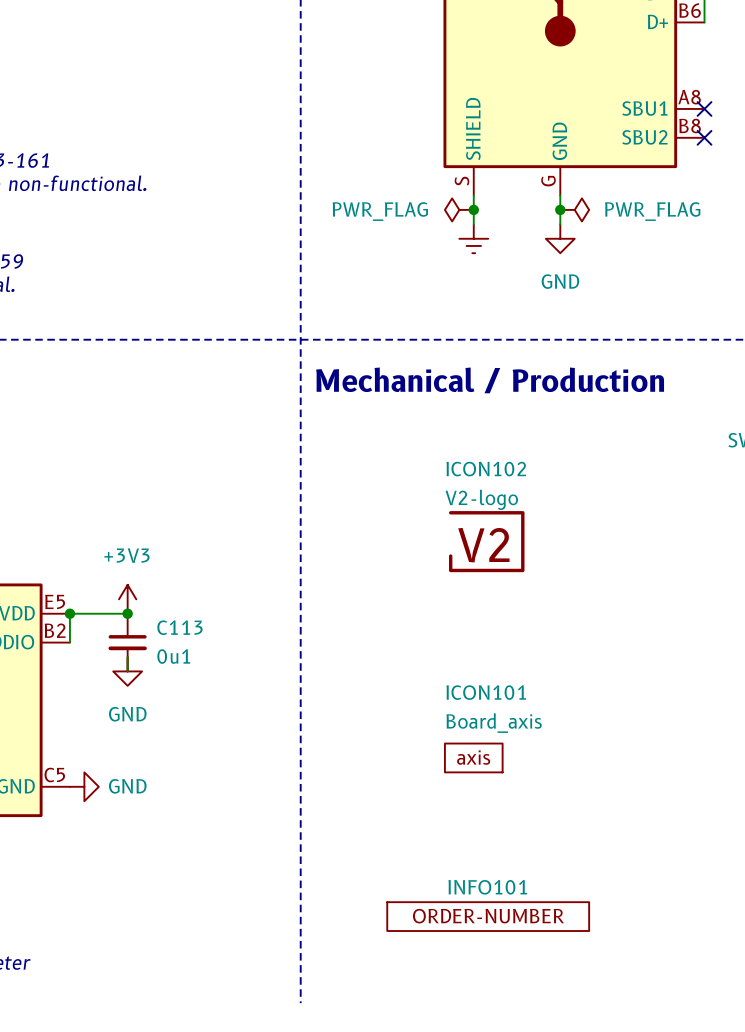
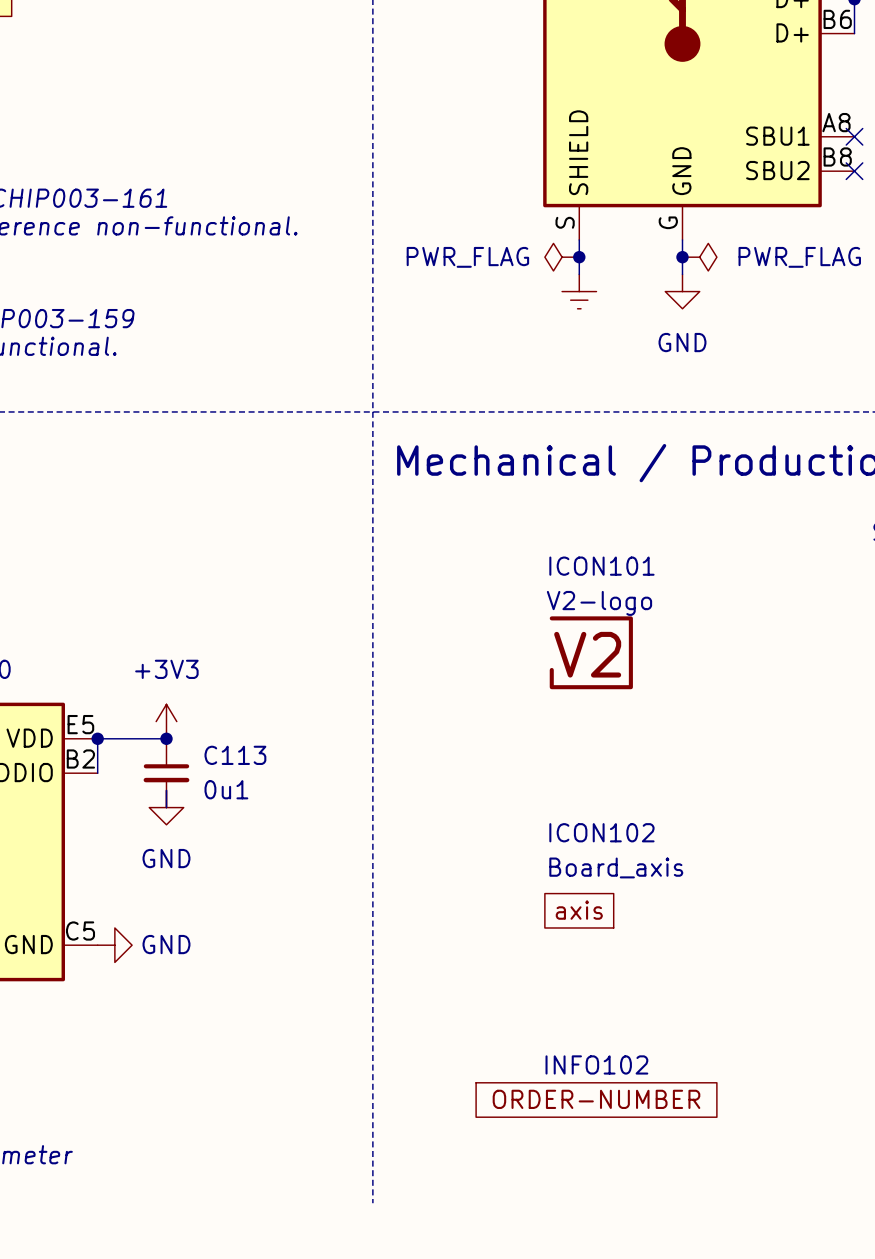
ICON101: none -> V2-logo (591, 652)
ICON102: V2-logo (486, 541) -> none
ICON101 name: ICON101 (486, 692) -> ICON102 (601, 832)
INFO101 name: INFO101 (487, 887) -> INFO102 (596, 1064)

